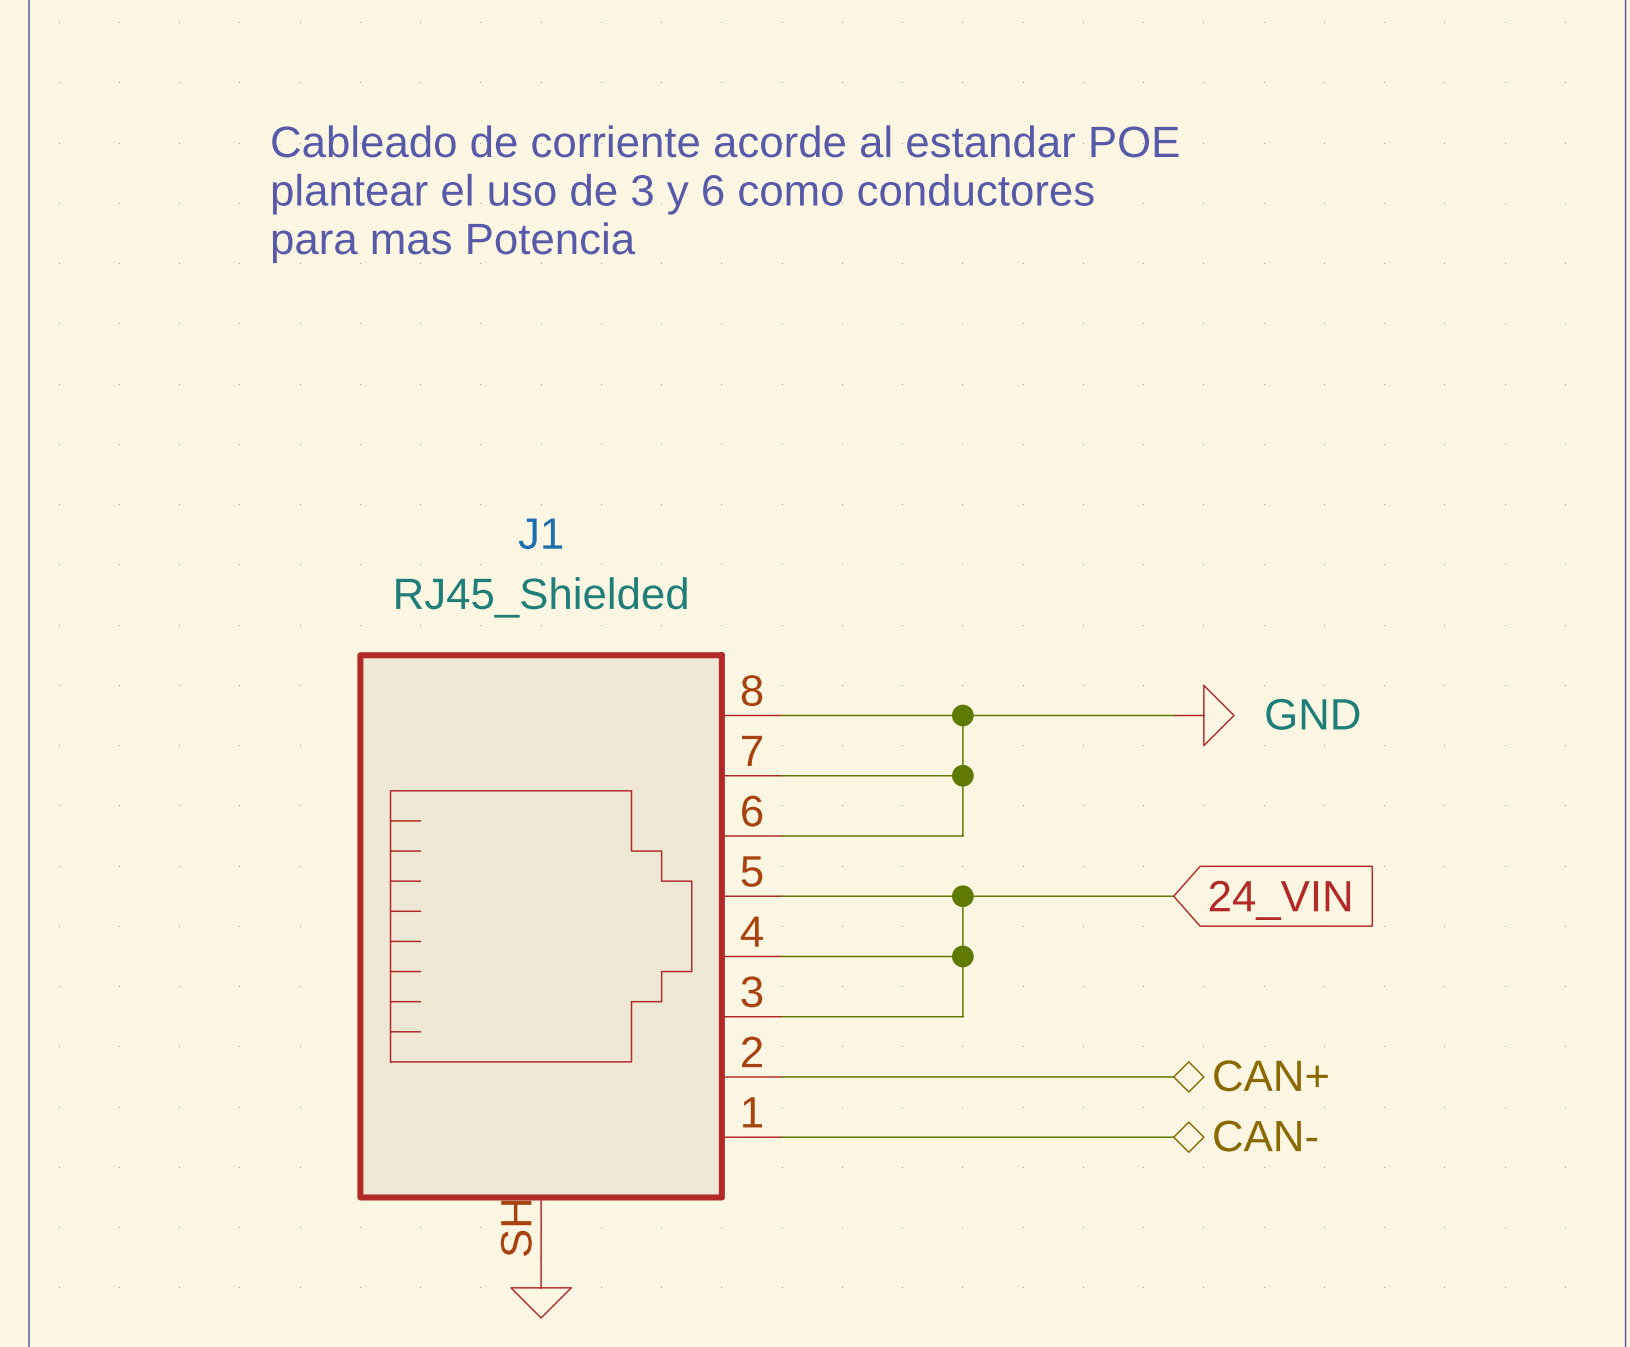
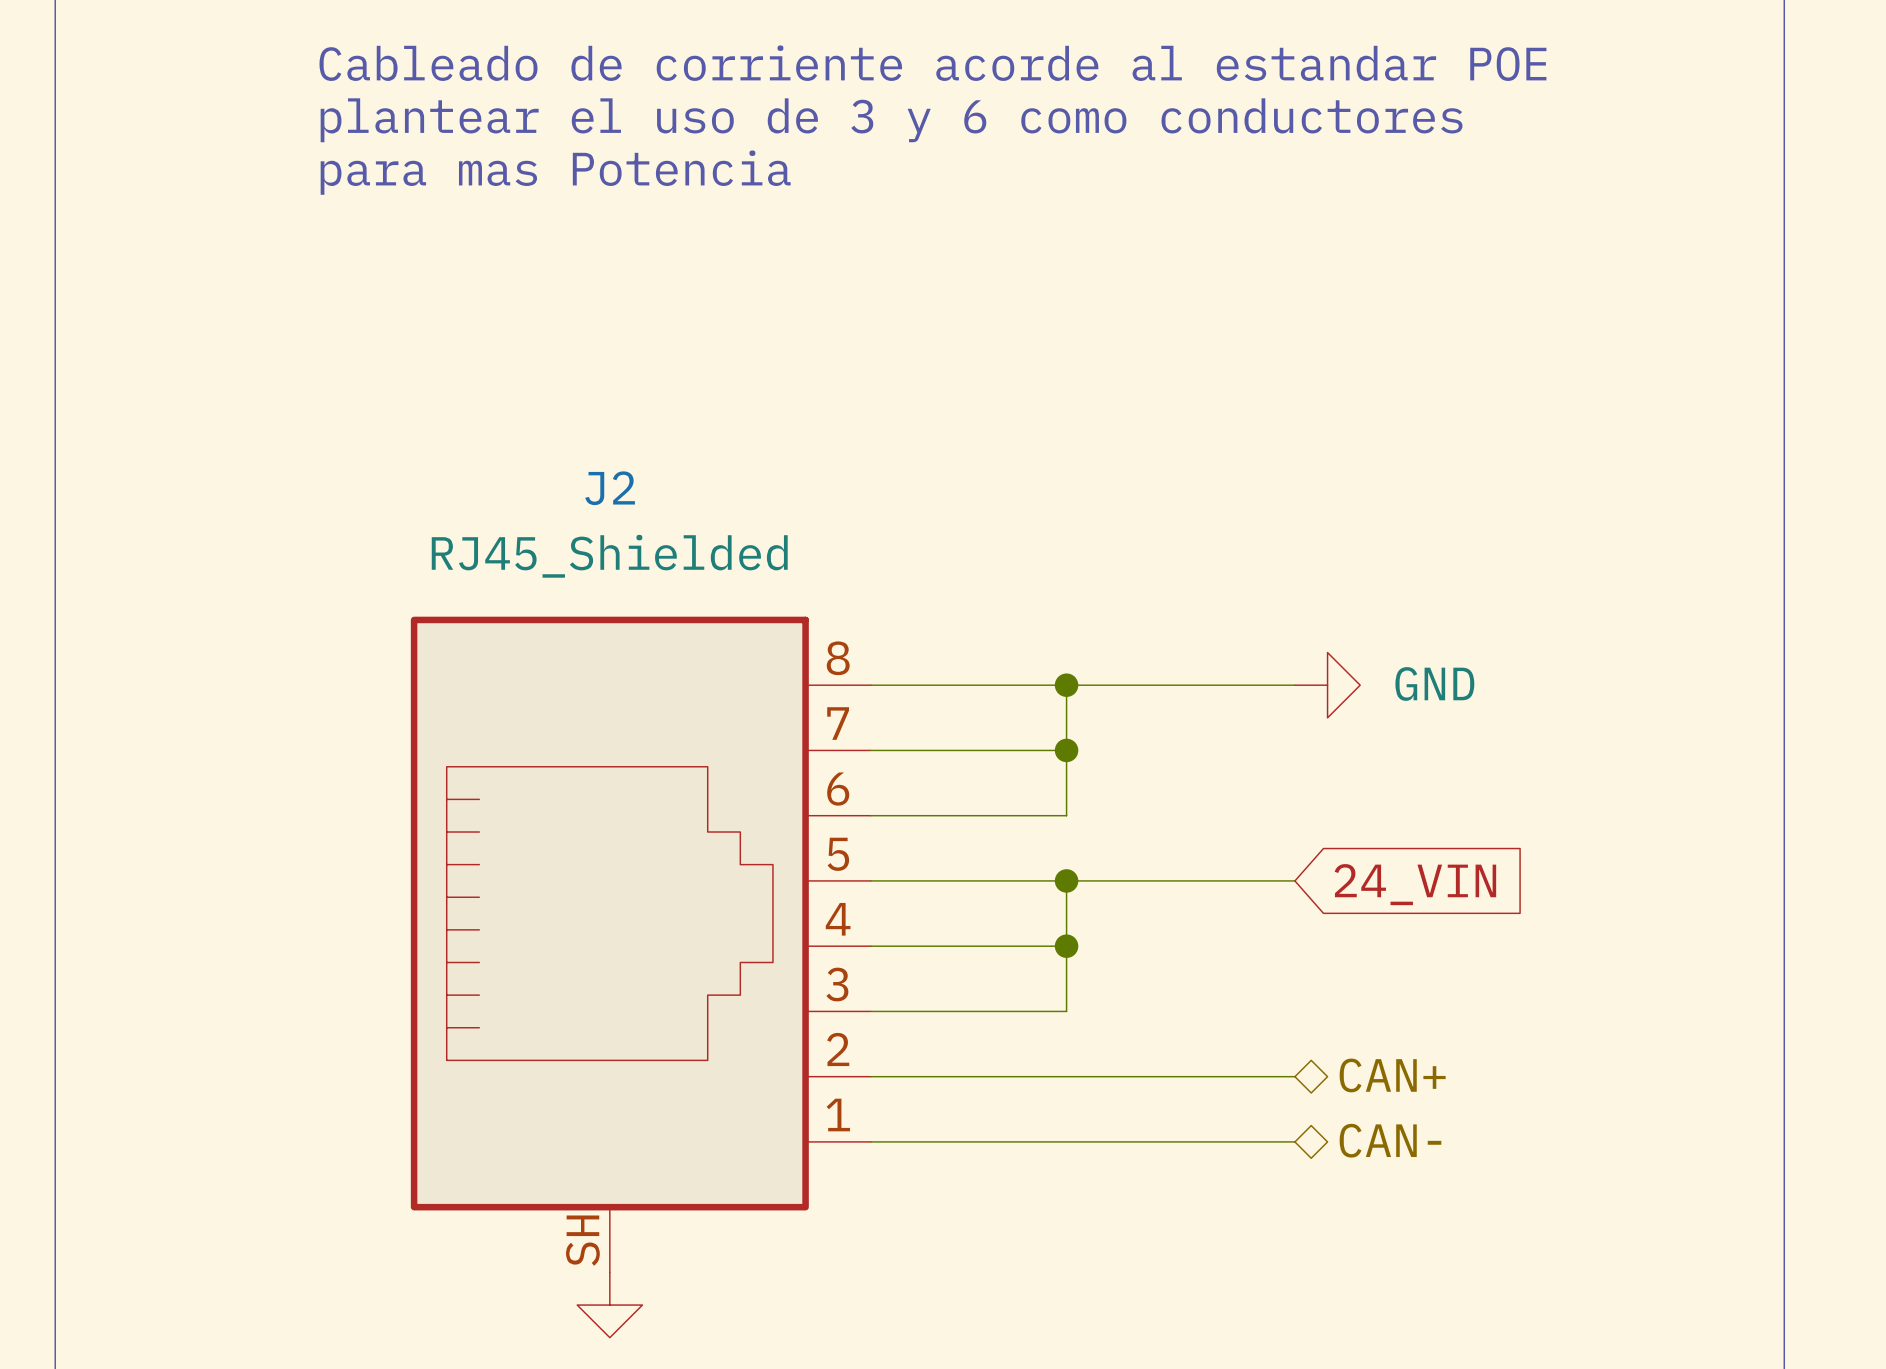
J1 name: J1 (540, 533) -> J2 (610, 488)

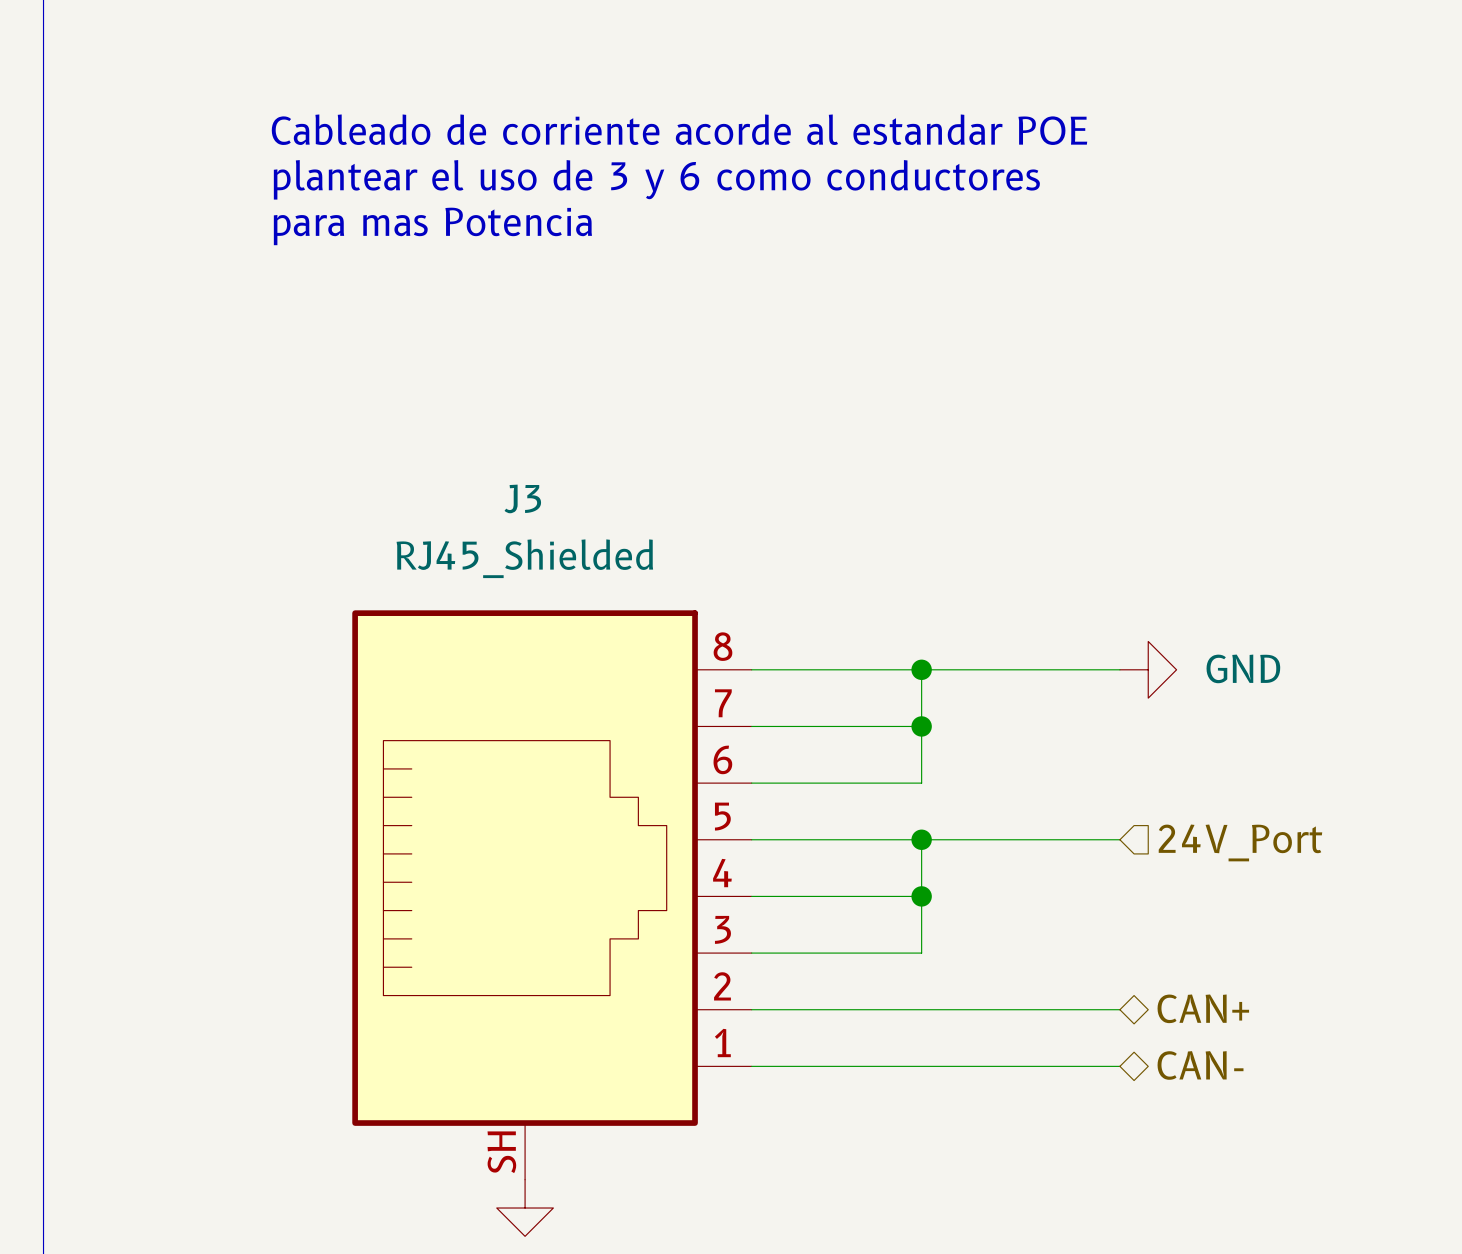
J2 name: J2 (610, 488) -> J3 (522, 498)
hierarchical label: none -> 24V_Port (1240, 842)
global label: 24_VIN (1415, 884) -> none

